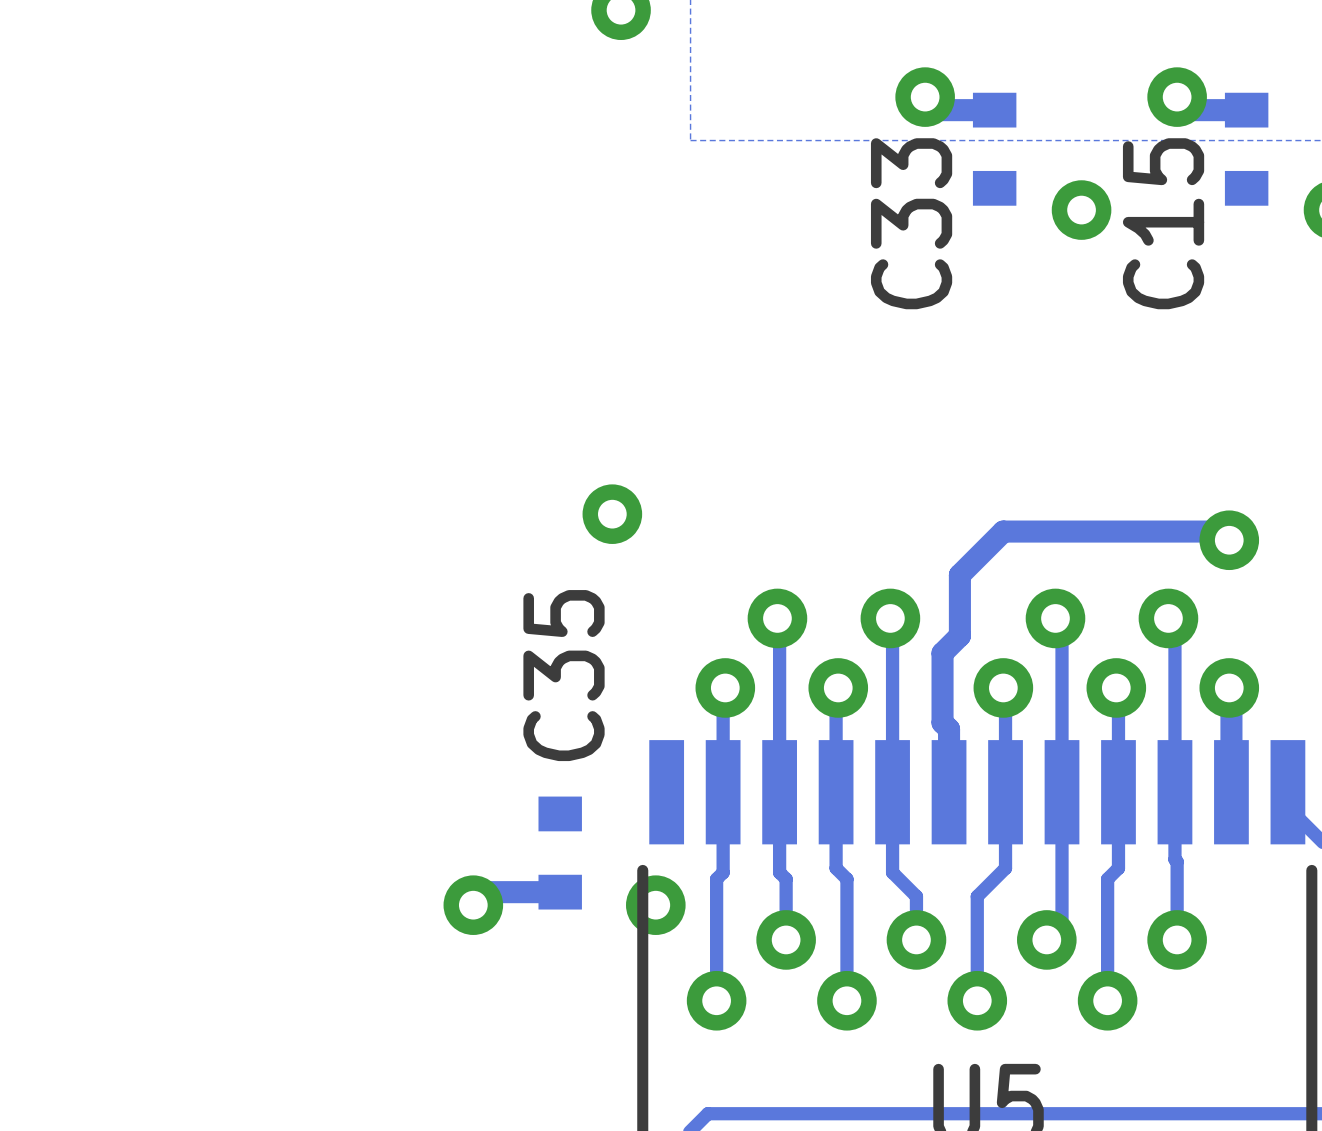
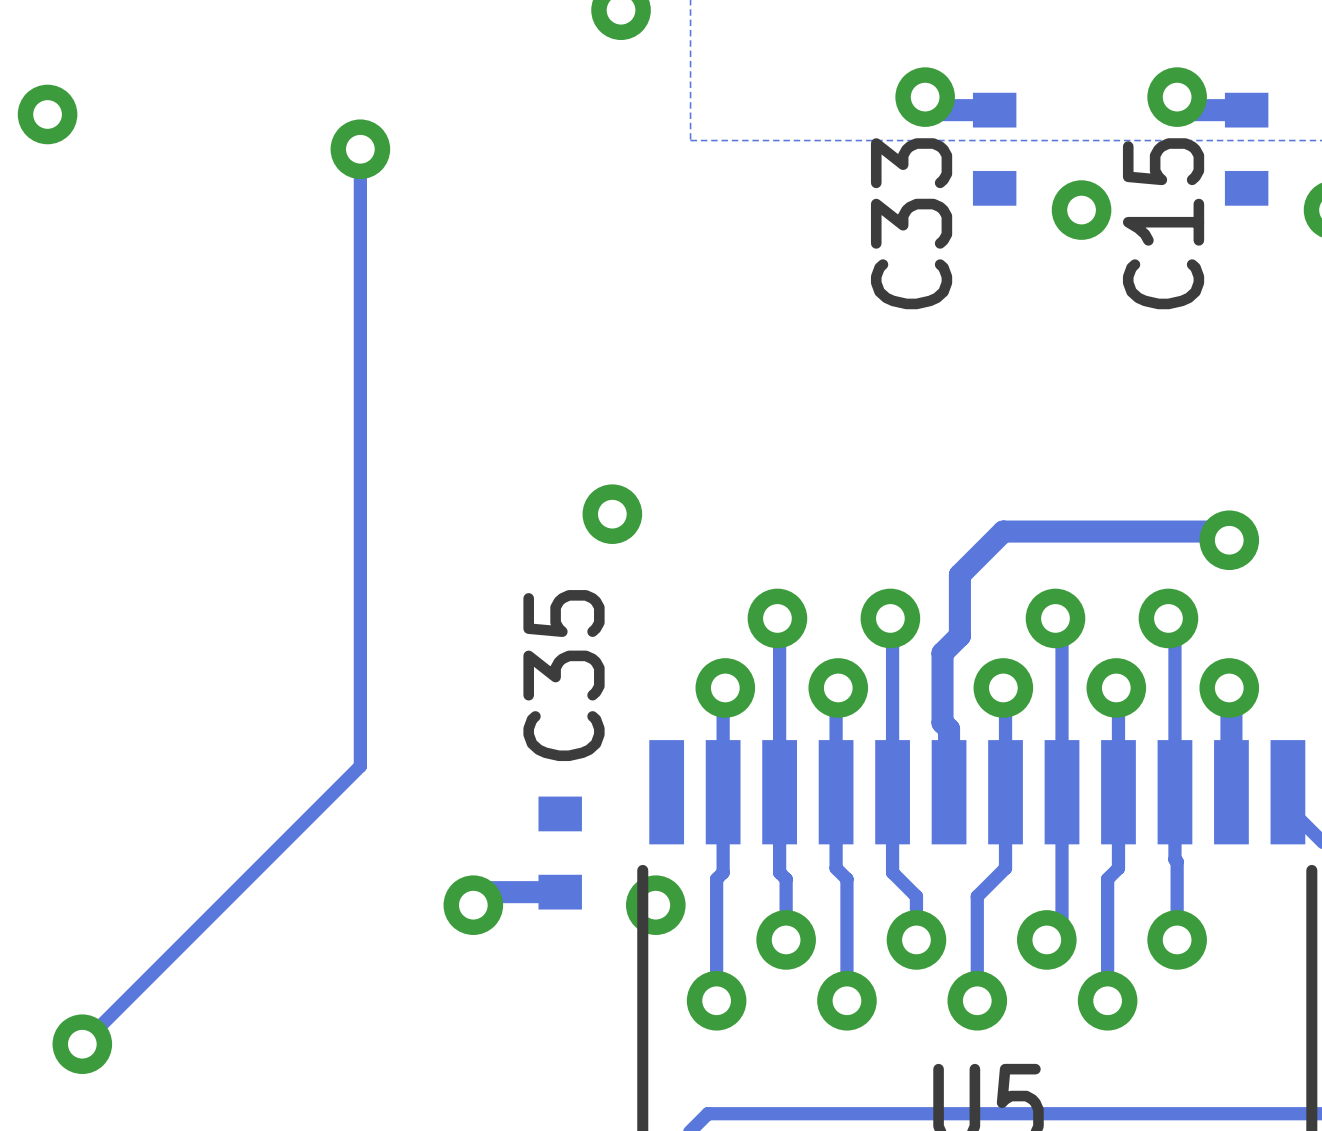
via: none -> (47, 114)
track: none -> (360, 149) (360, 766) (82, 1044)
via: none -> (360, 149)
via: none -> (82, 1044)

